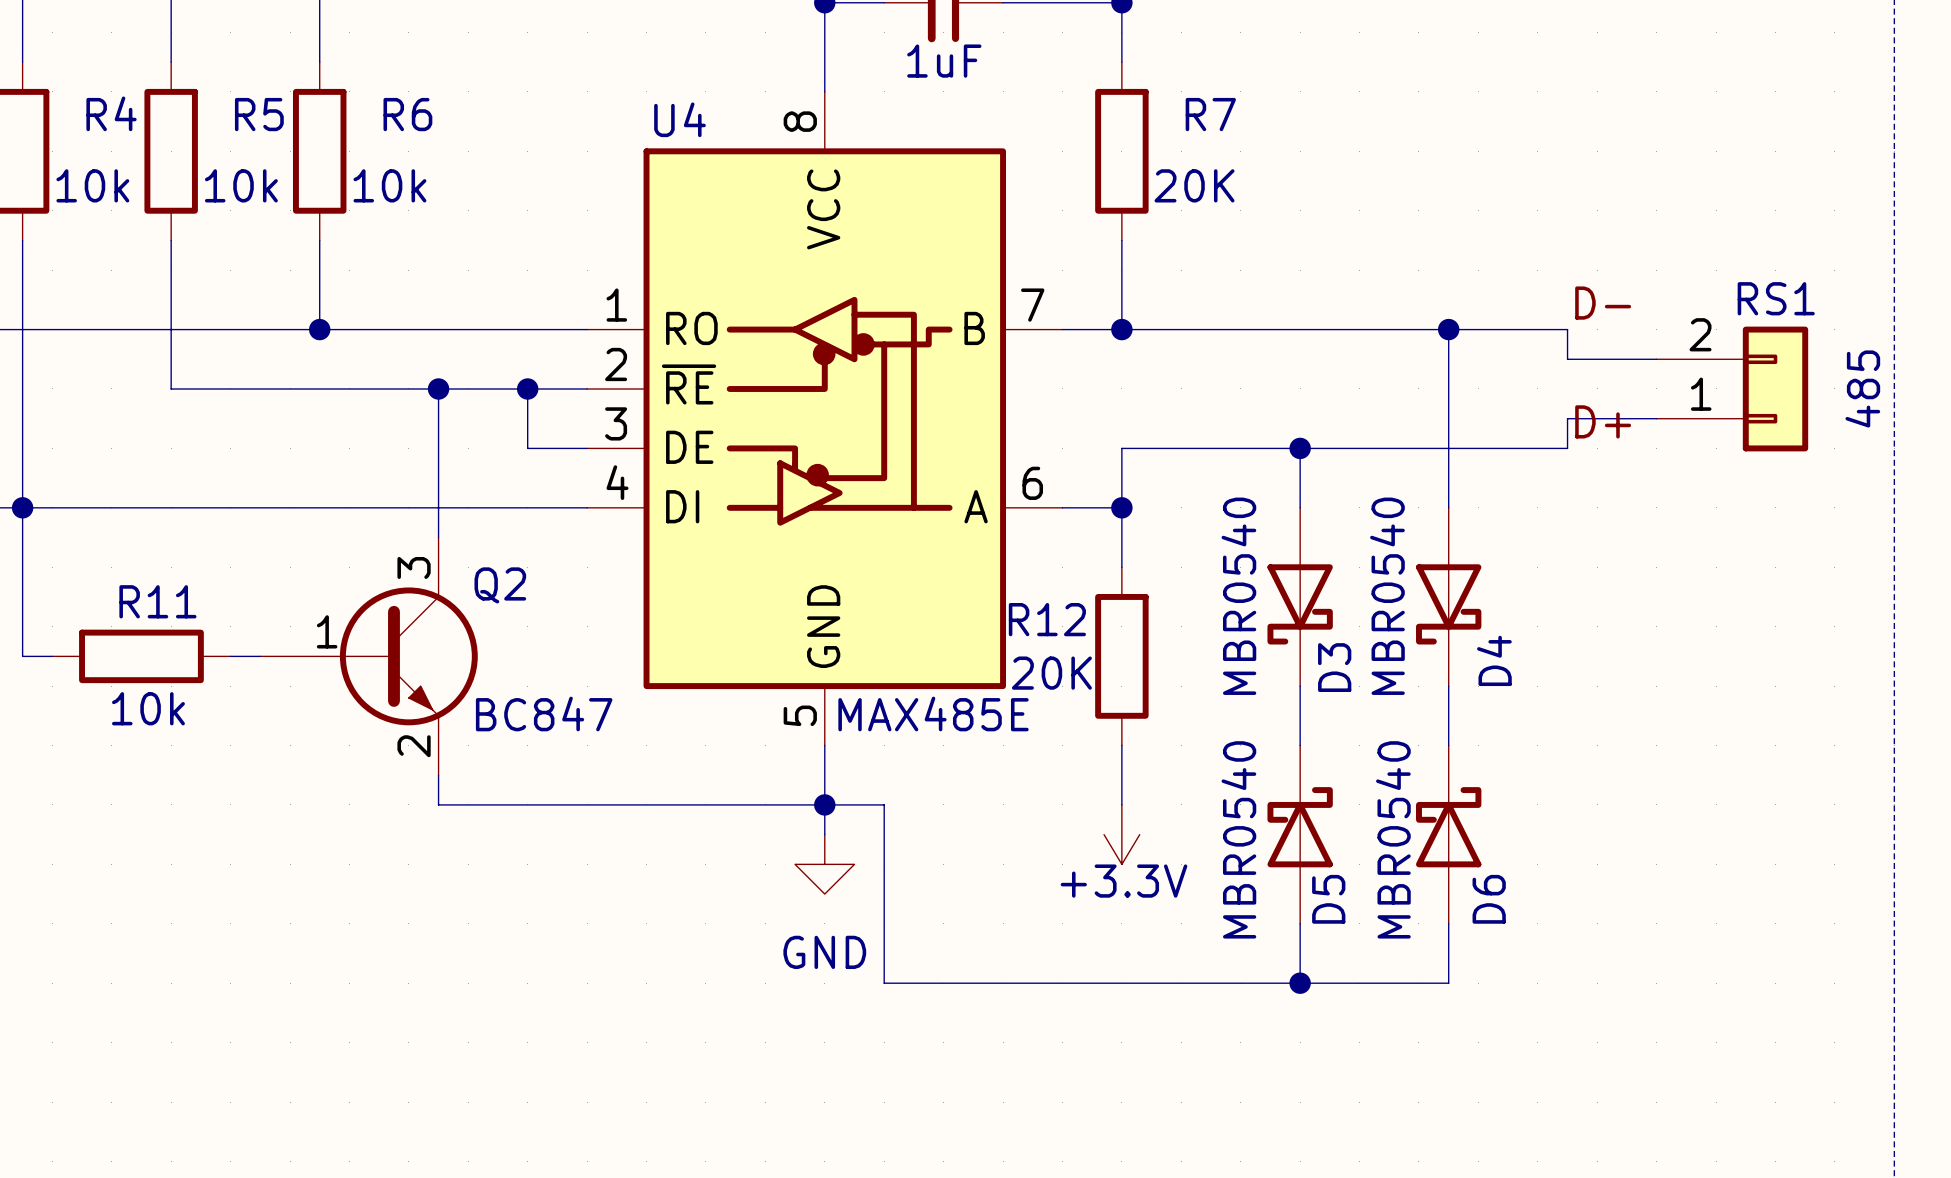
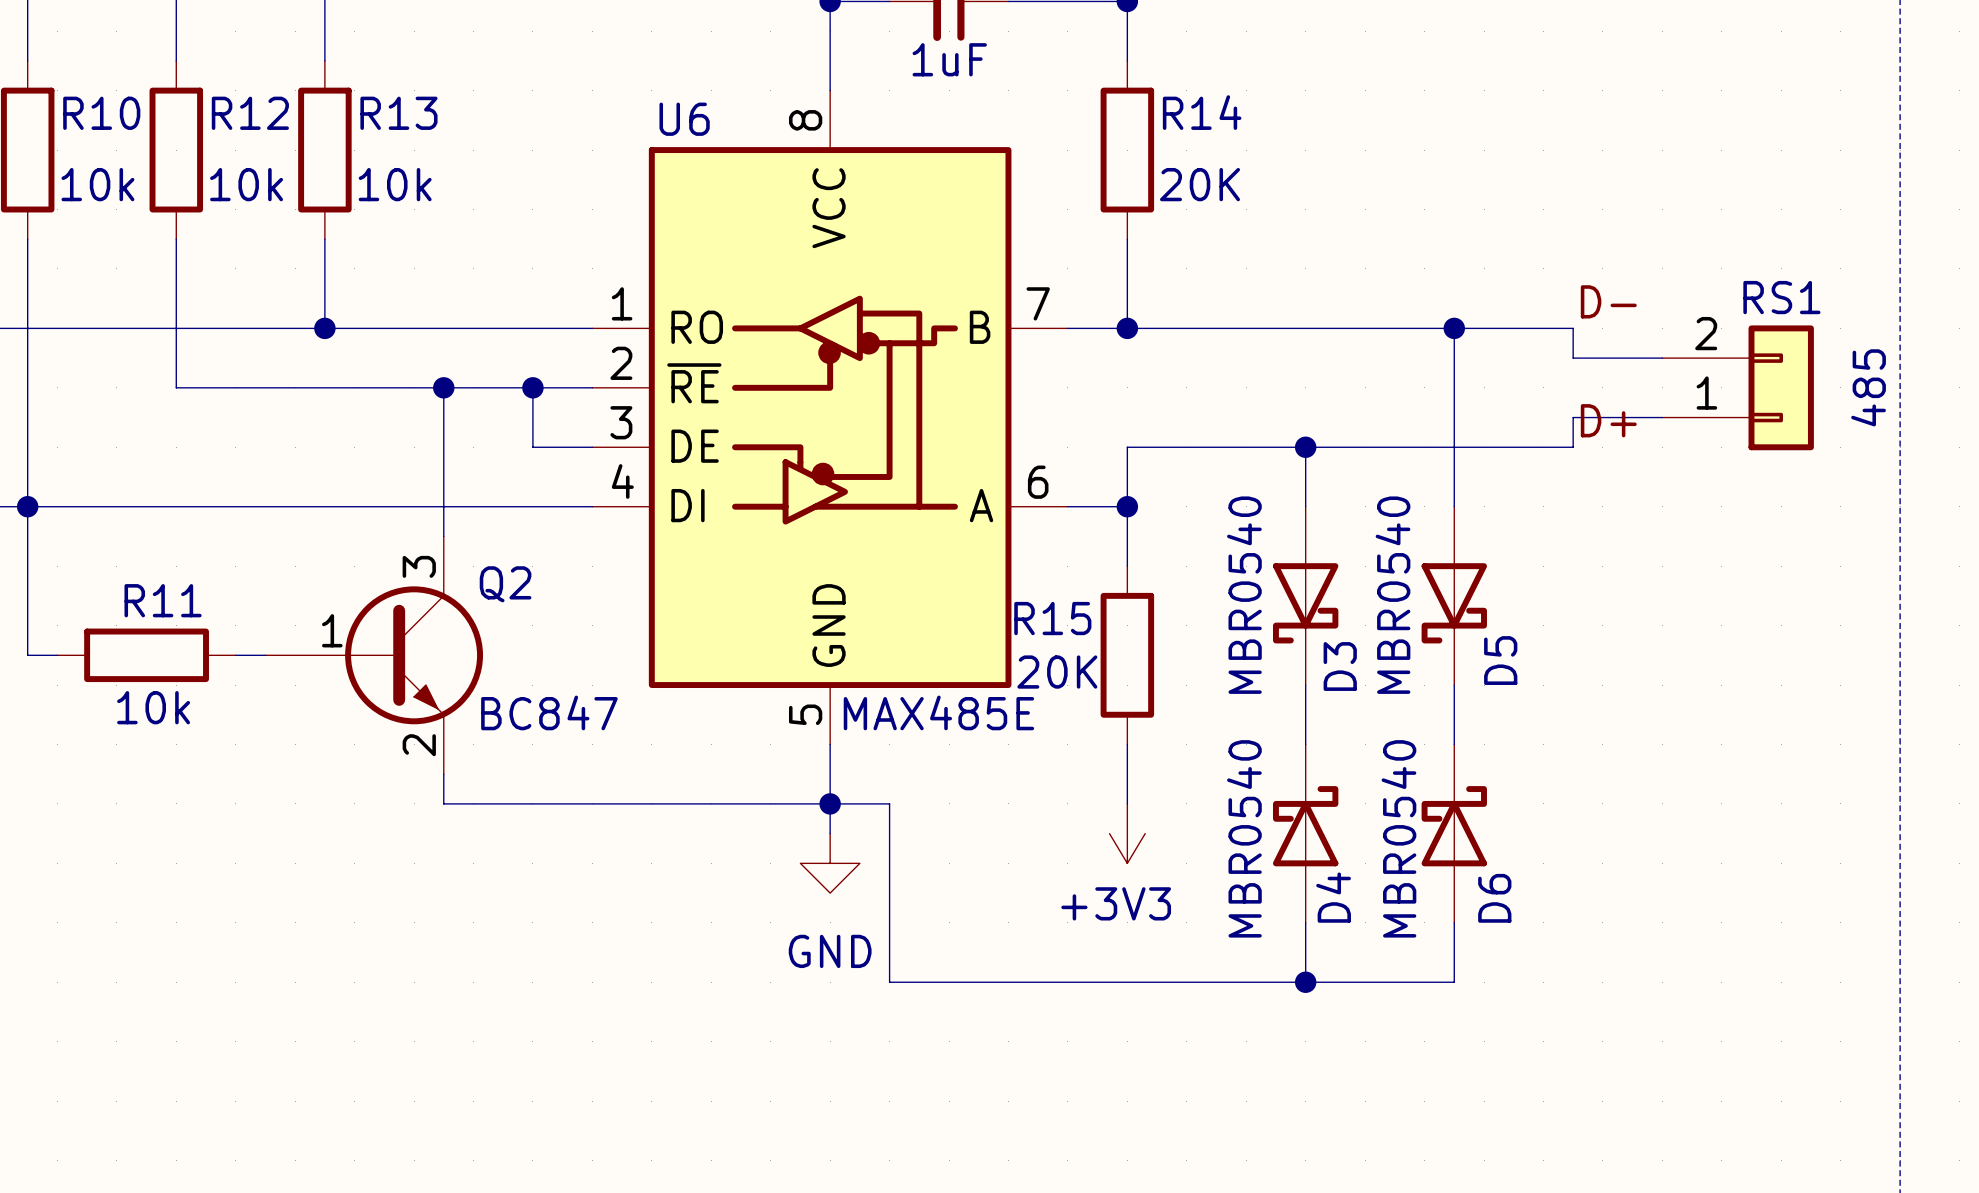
R4 name: R4 (111, 113) -> R10 (101, 113)
R5 name: R5 (259, 114) -> R12 (250, 113)
R6 name: R6 (407, 114) -> R13 (398, 113)
R7 name: R7 (1210, 114) -> R14 (1202, 112)
U4 name: U4 (679, 119) -> U6 (684, 119)
R12 name: R12 (1047, 619) -> R15 (1052, 618)
D4 name: D4 (1494, 660) -> D5 (1500, 660)
power symbol: +3.3V (1121, 834) -> +3V3 (1127, 833)
D5 name: D5 (1328, 899) -> D4 (1333, 897)

